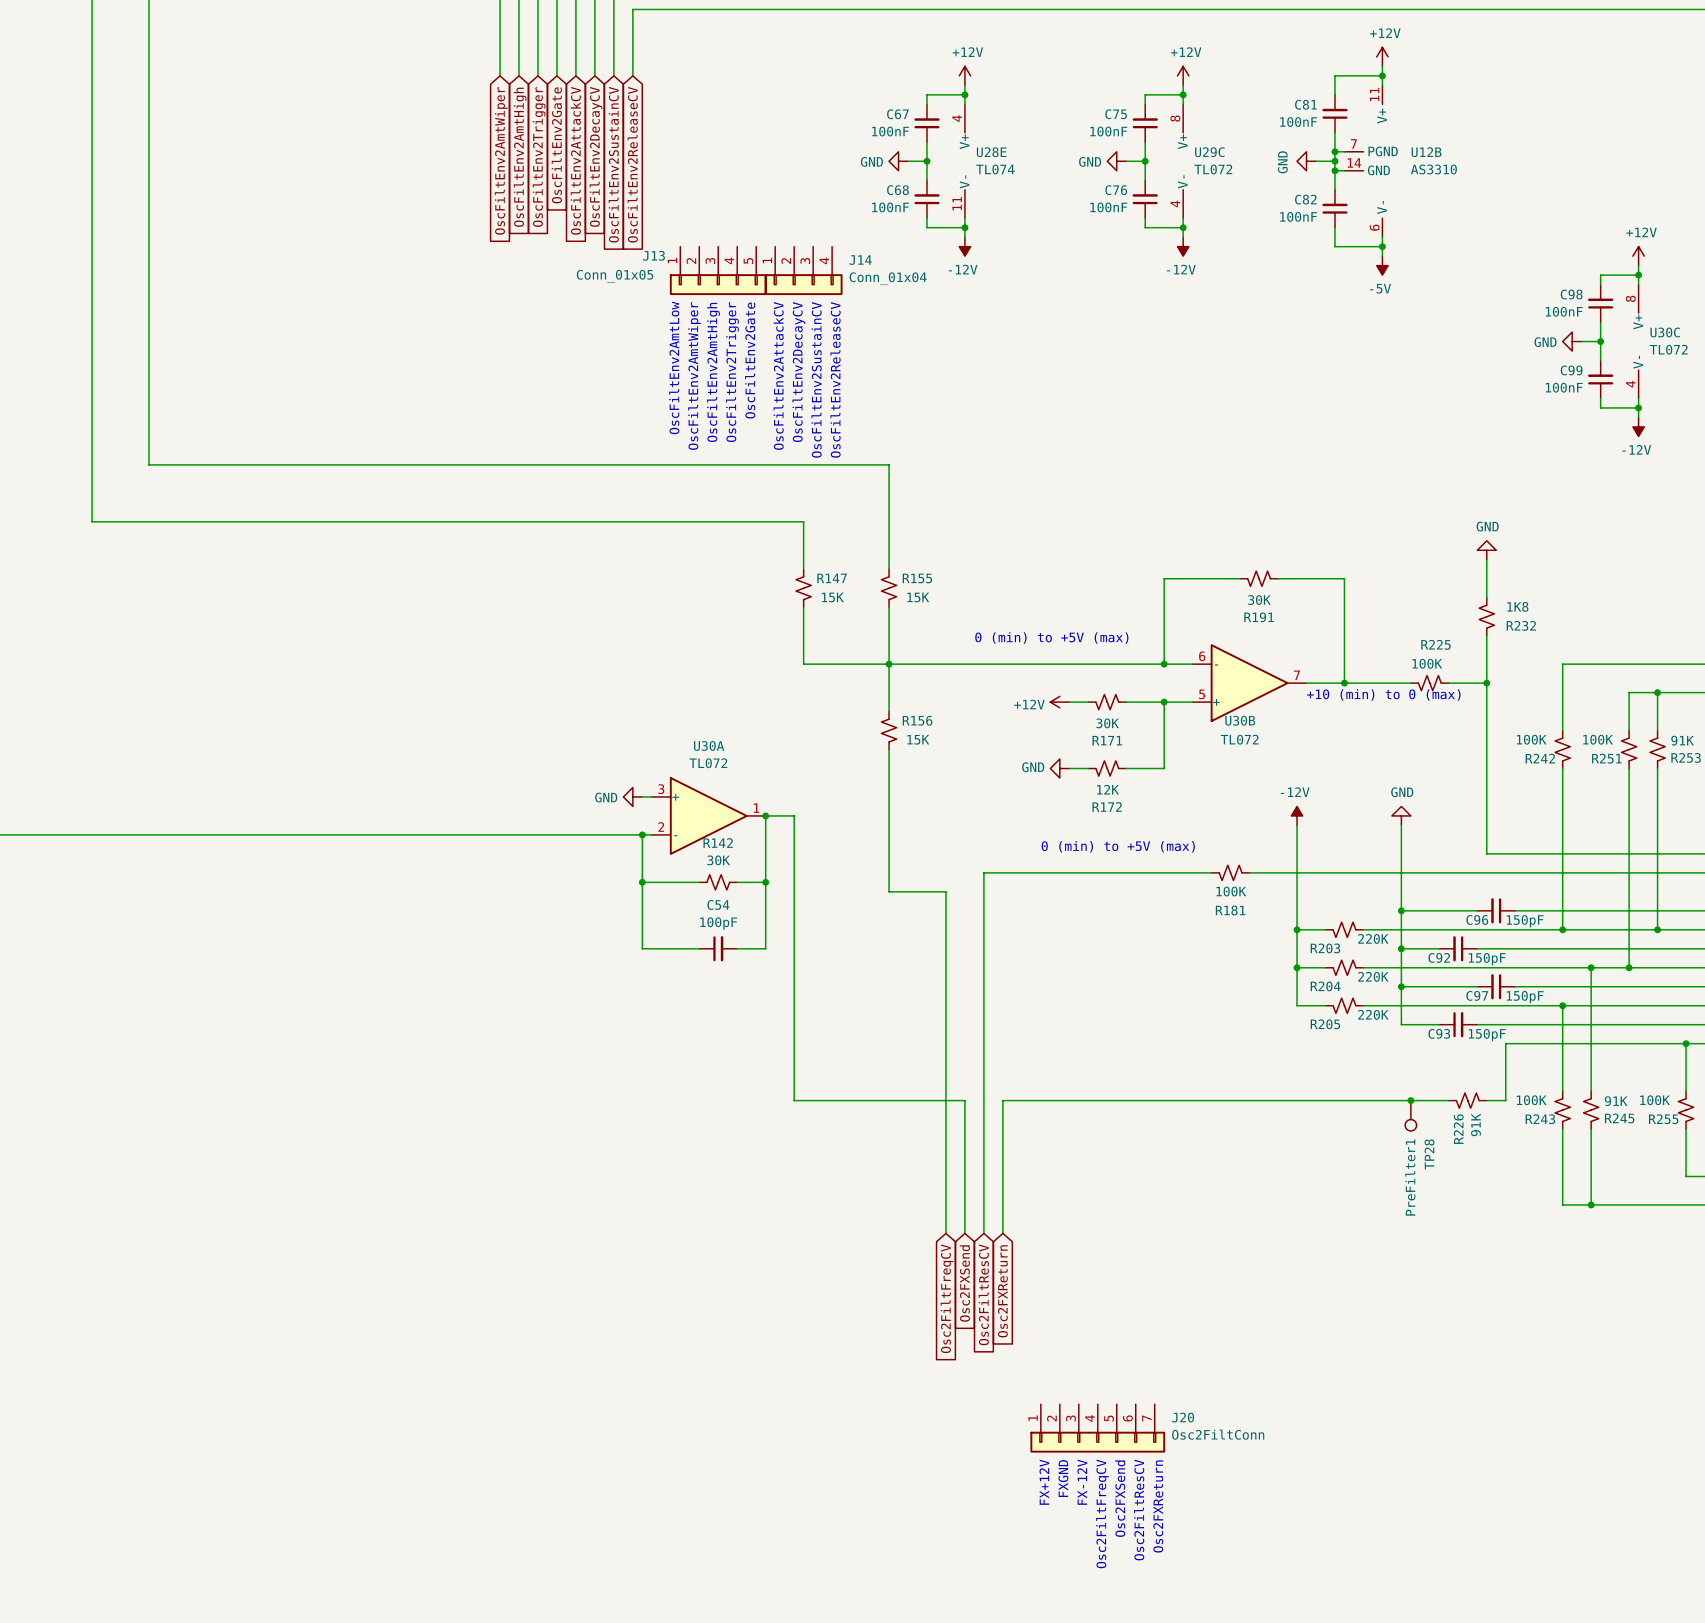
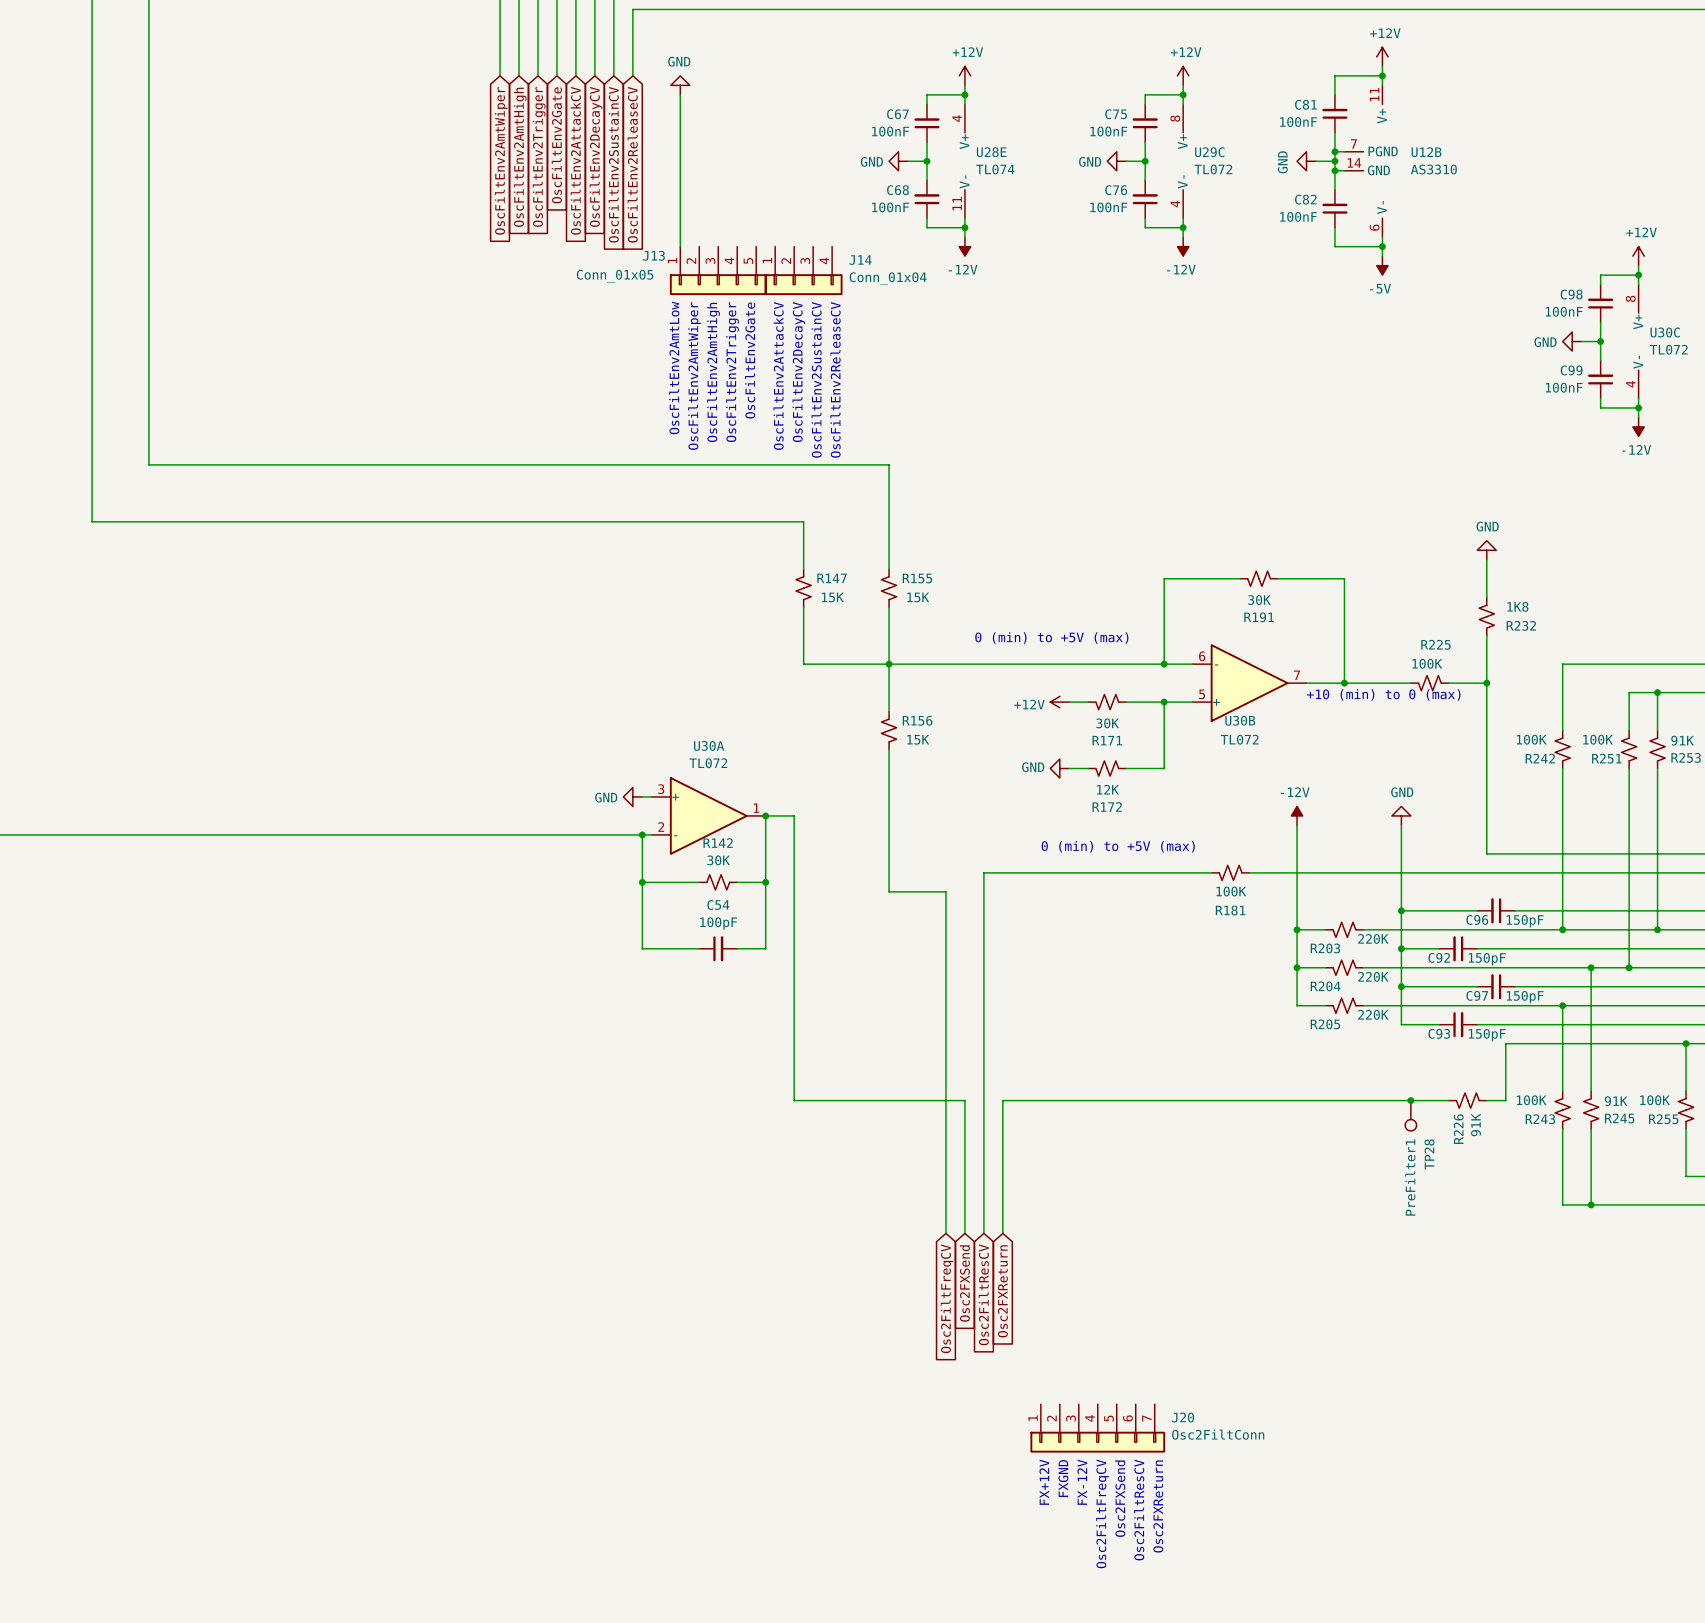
power symbol: none -> GND (680, 85)
wire: none -> (680, 94) (680, 246)

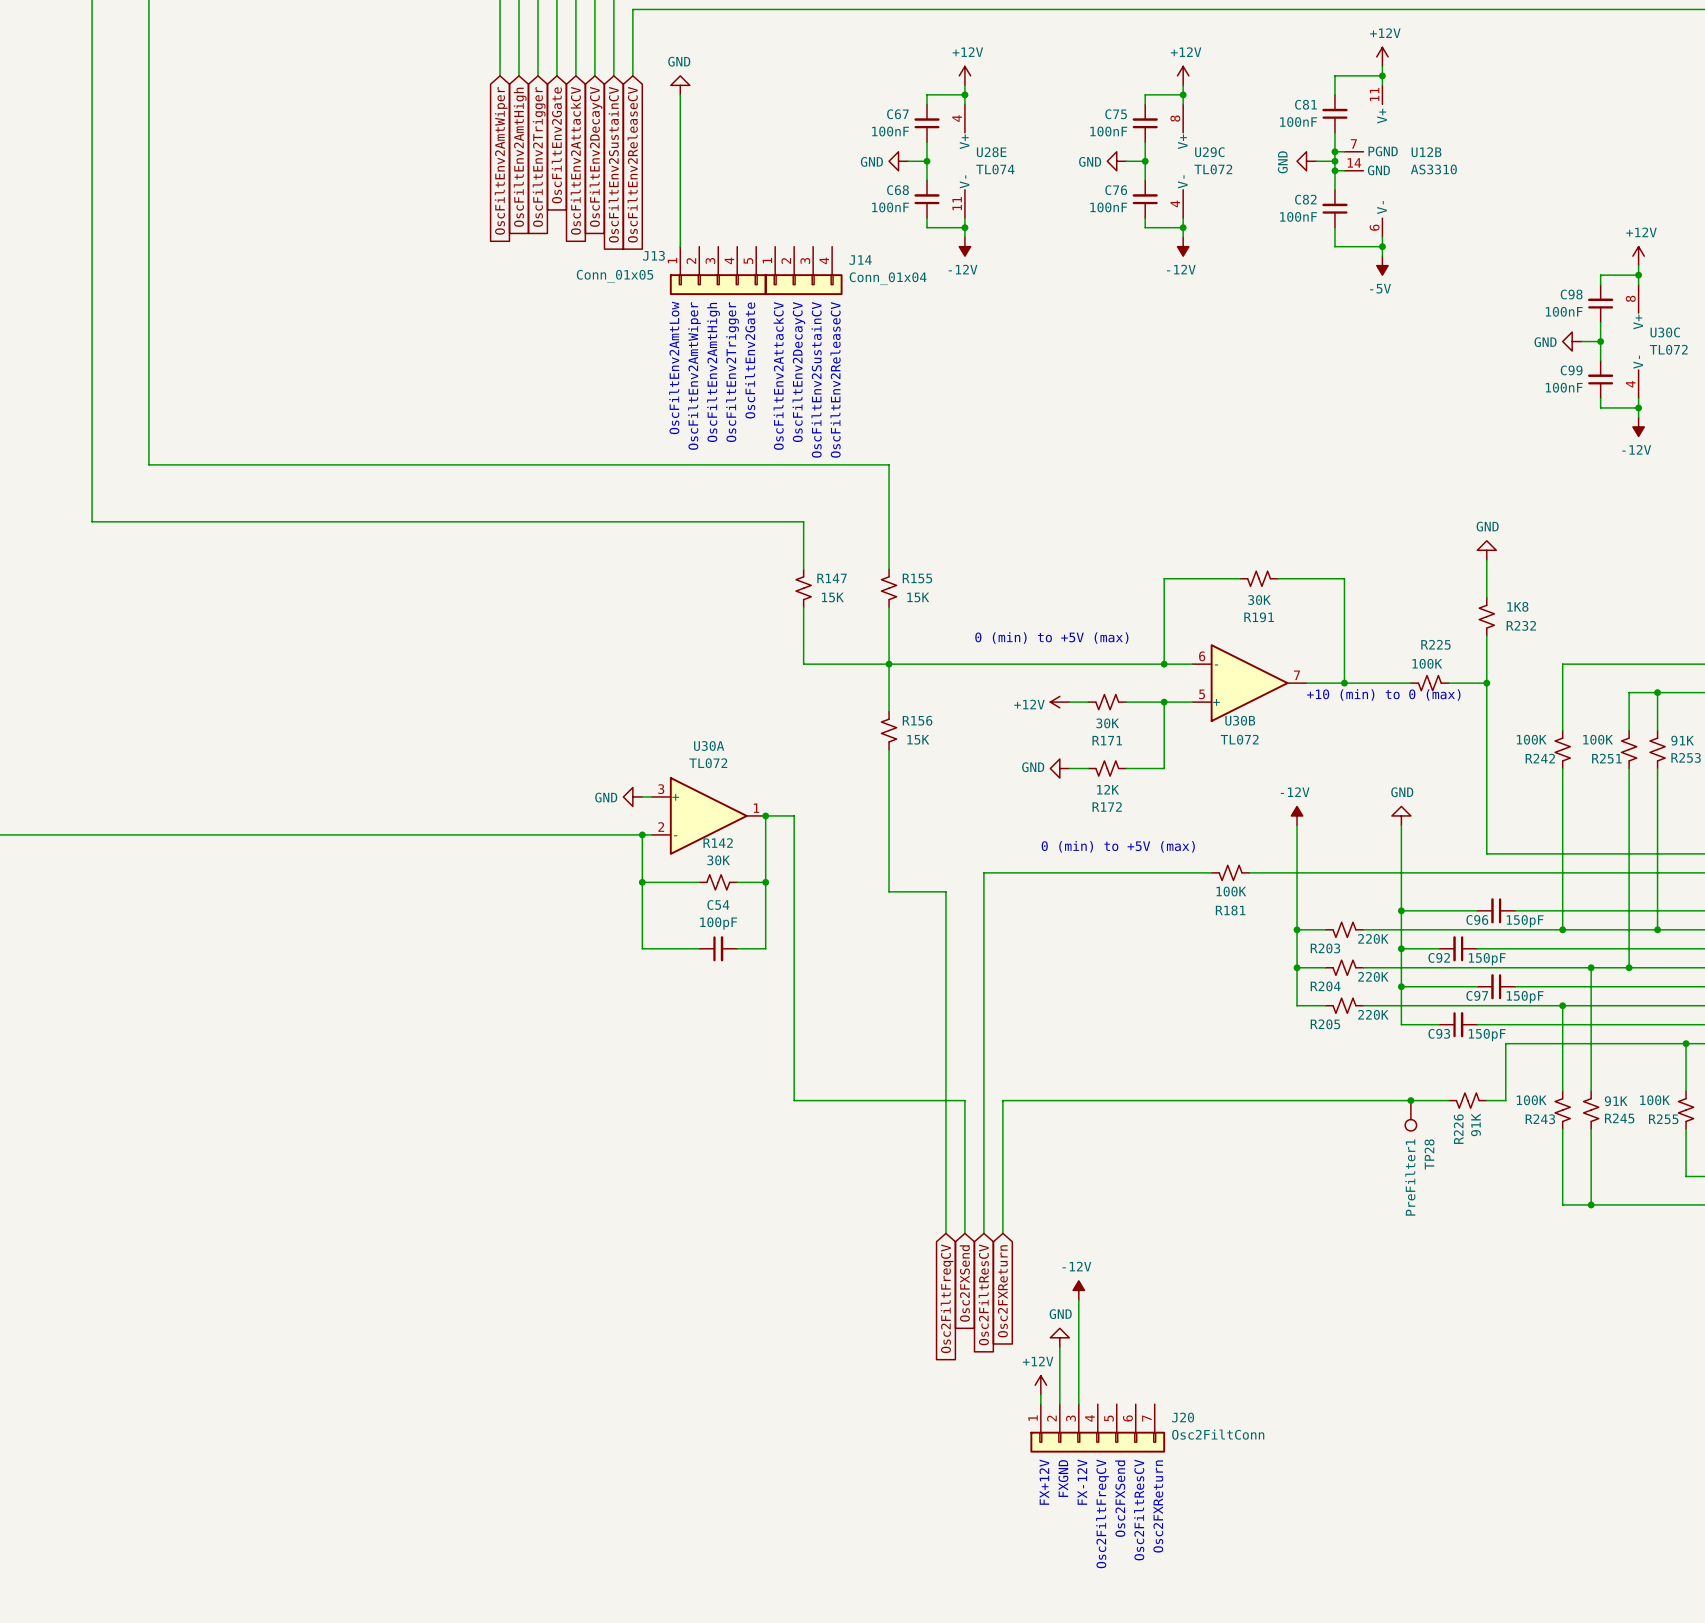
power symbol: none -> -12V (1078, 1290)
wire: none -> (1078, 1299) (1078, 1404)
power symbol: none -> GND (1059, 1337)
wire: none -> (1059, 1347) (1059, 1404)
power symbol: none -> +12V (1040, 1385)
wire: none -> (1040, 1394) (1040, 1404)

